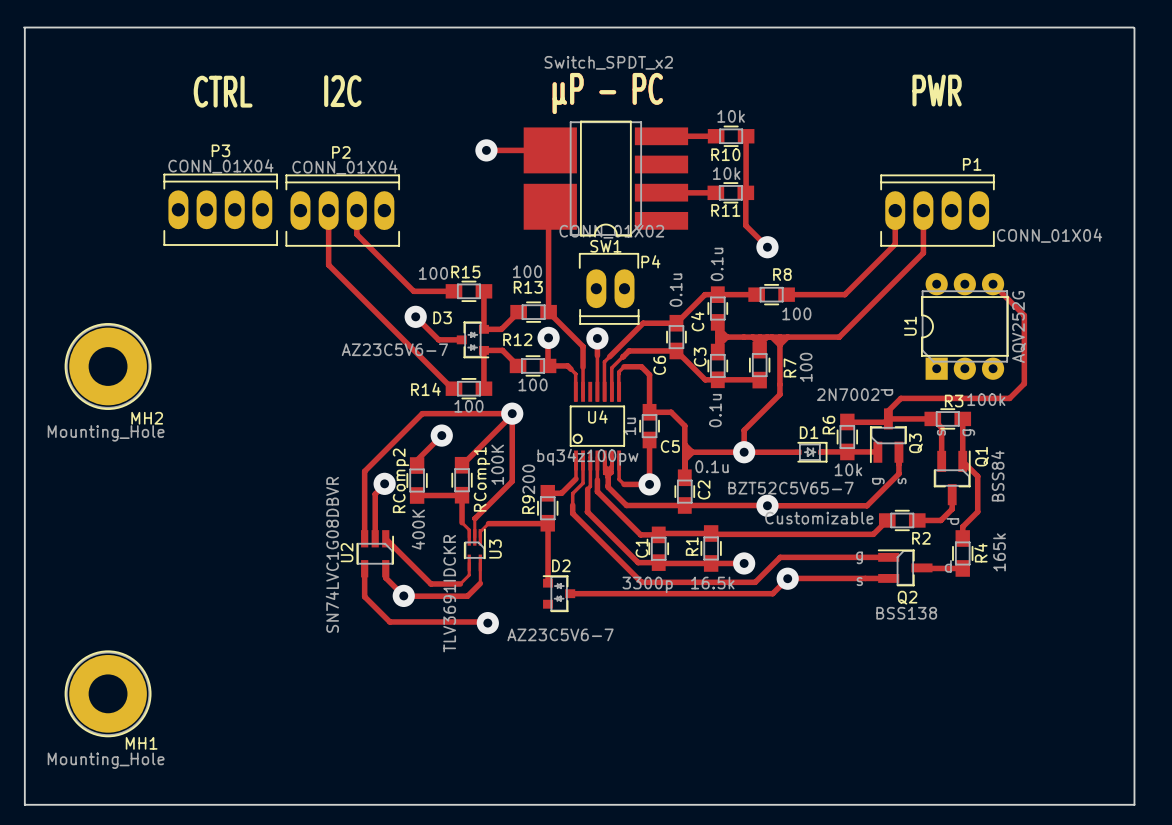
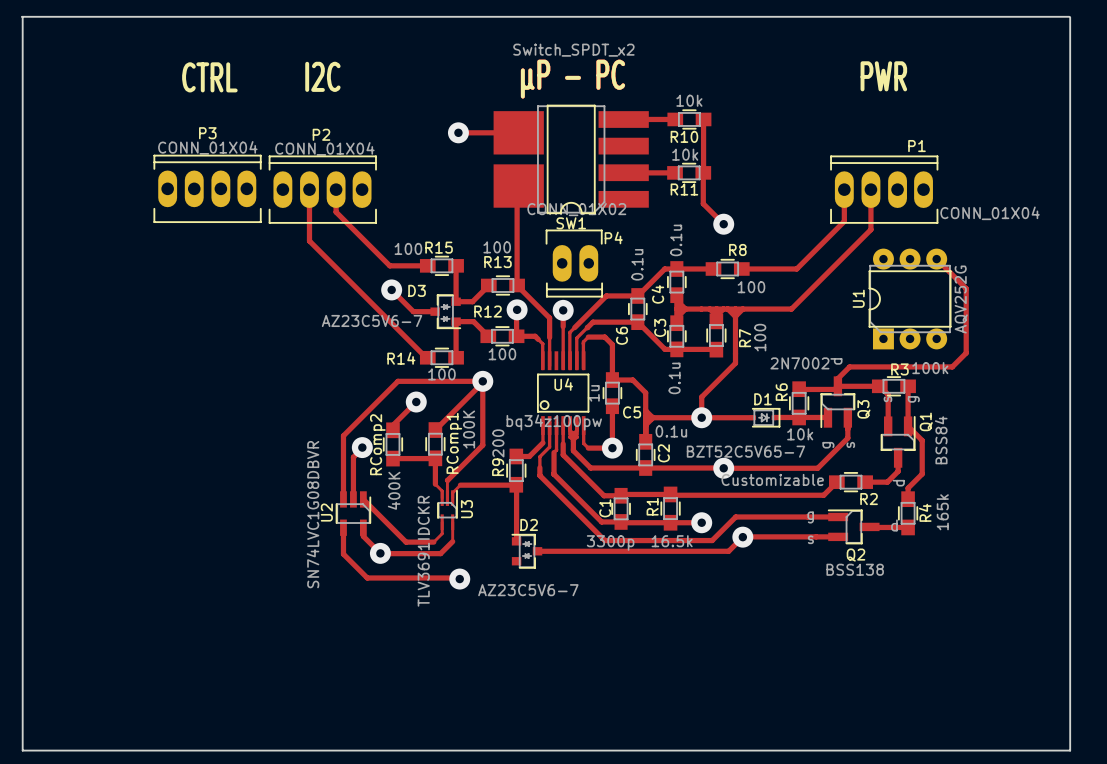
MH2: Mounting_Hole (108, 366) -> none
MH1: Mounting_Hole (108, 693) -> none

